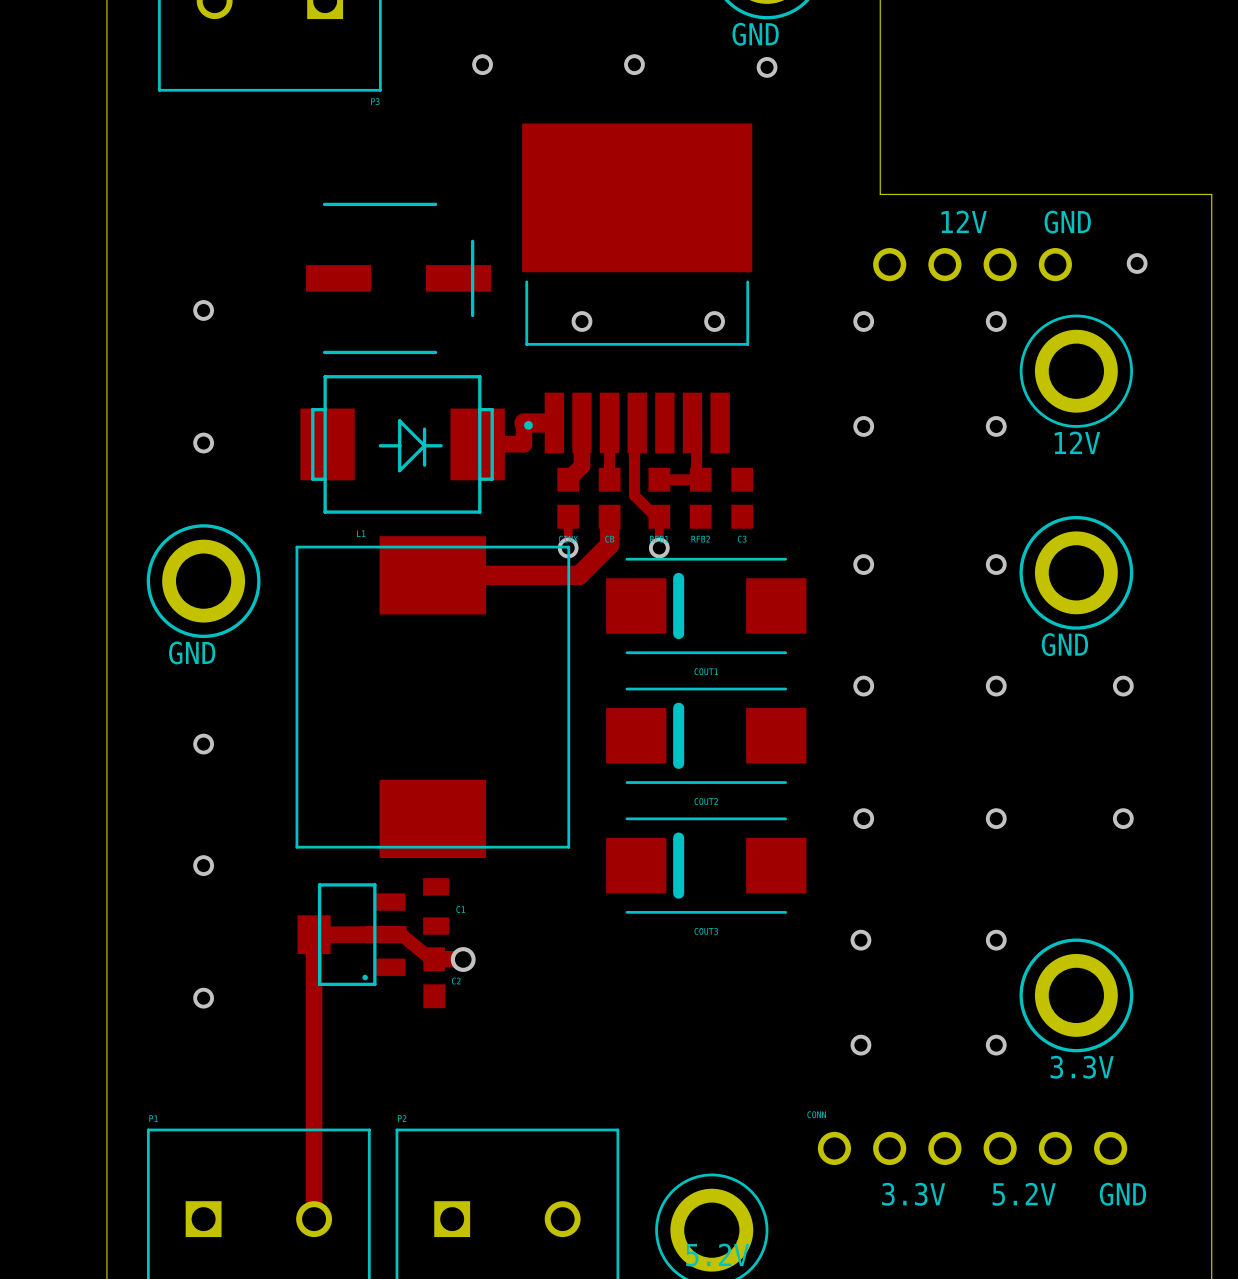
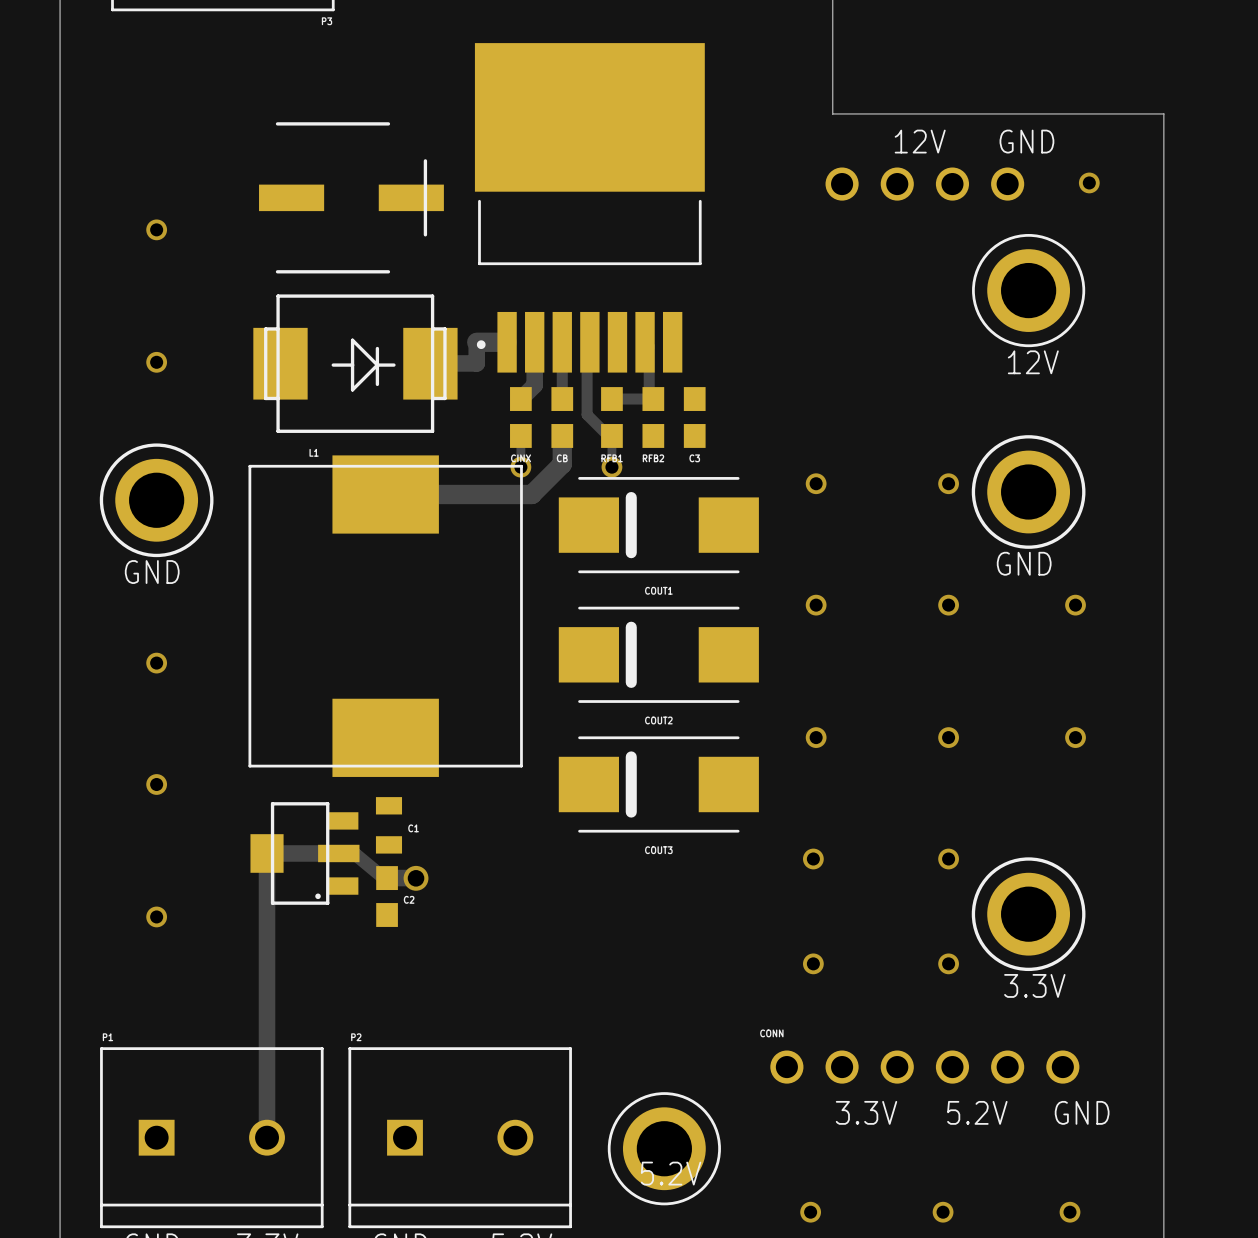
via: (581, 321) -> none
via: (714, 321) -> none
via: (863, 321) -> none
via: (996, 321) -> none
via: (863, 426) -> none
via: (996, 426) -> none

